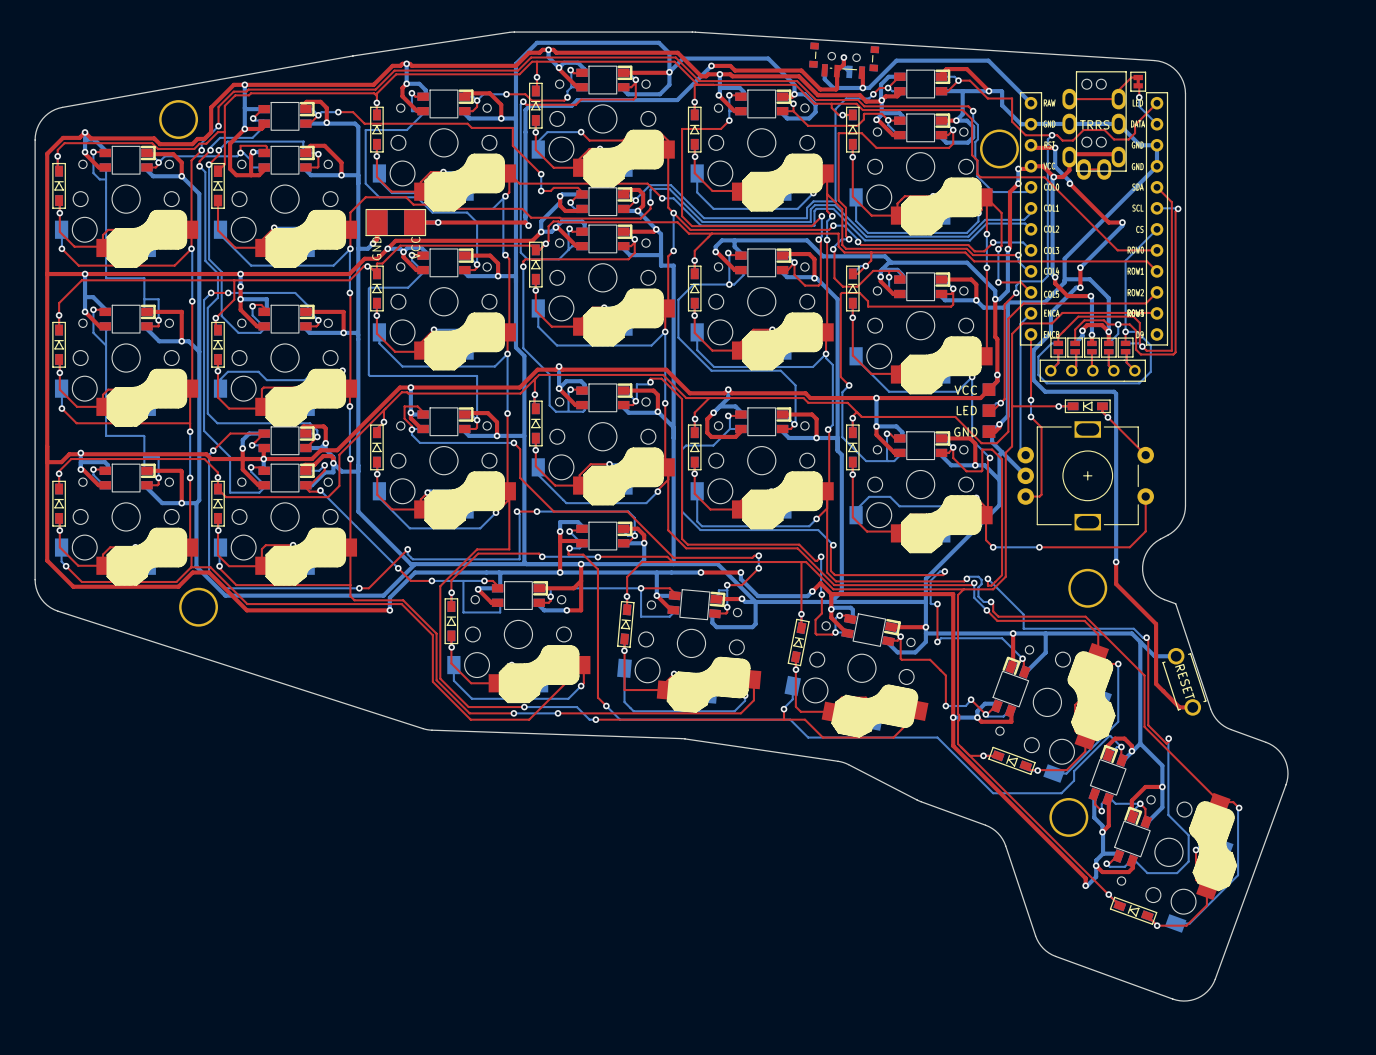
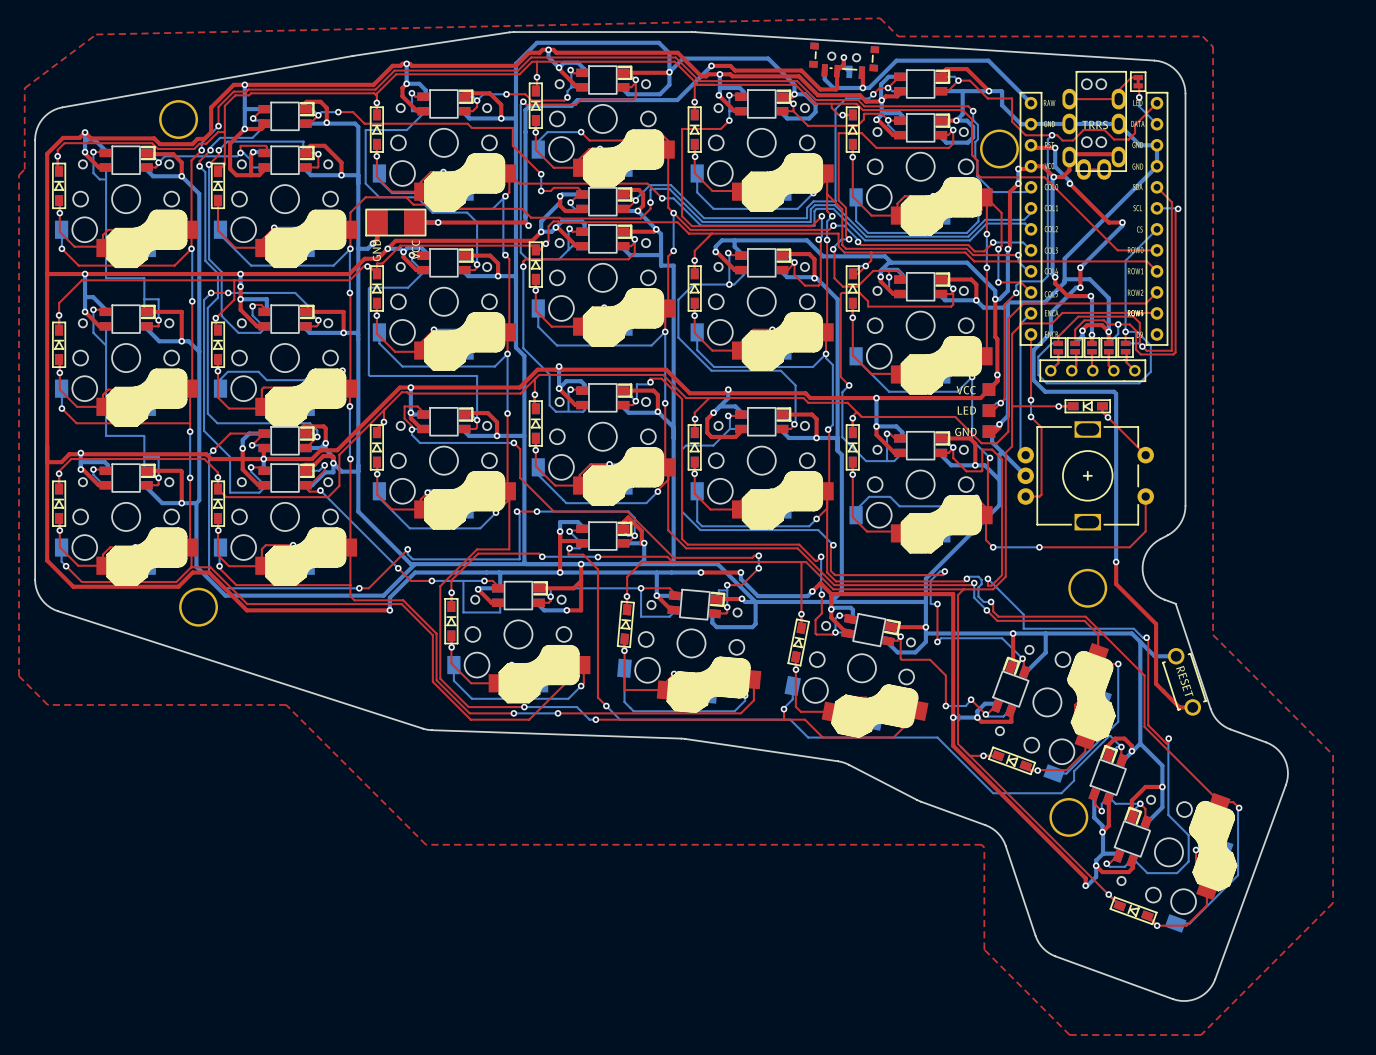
top zone outline: none -> (880, 18) (96, 34) (24, 88) (24, 169) (19, 175) (19, 676) (47, 704) (286, 704) (426, 844) (981, 844) (984, 847) (984, 949) (1069, 1035) (1201, 1035) (1333, 902) (1333, 754) (1213, 634) (1213, 46) (1202, 36) (898, 36) (880, 18)
top track: (621, 528) (637, 528) (644, 535) (644, 543) -> none
top track: none -> (623, 528) (623, 522) (628, 517) (641, 531) (641, 543)

